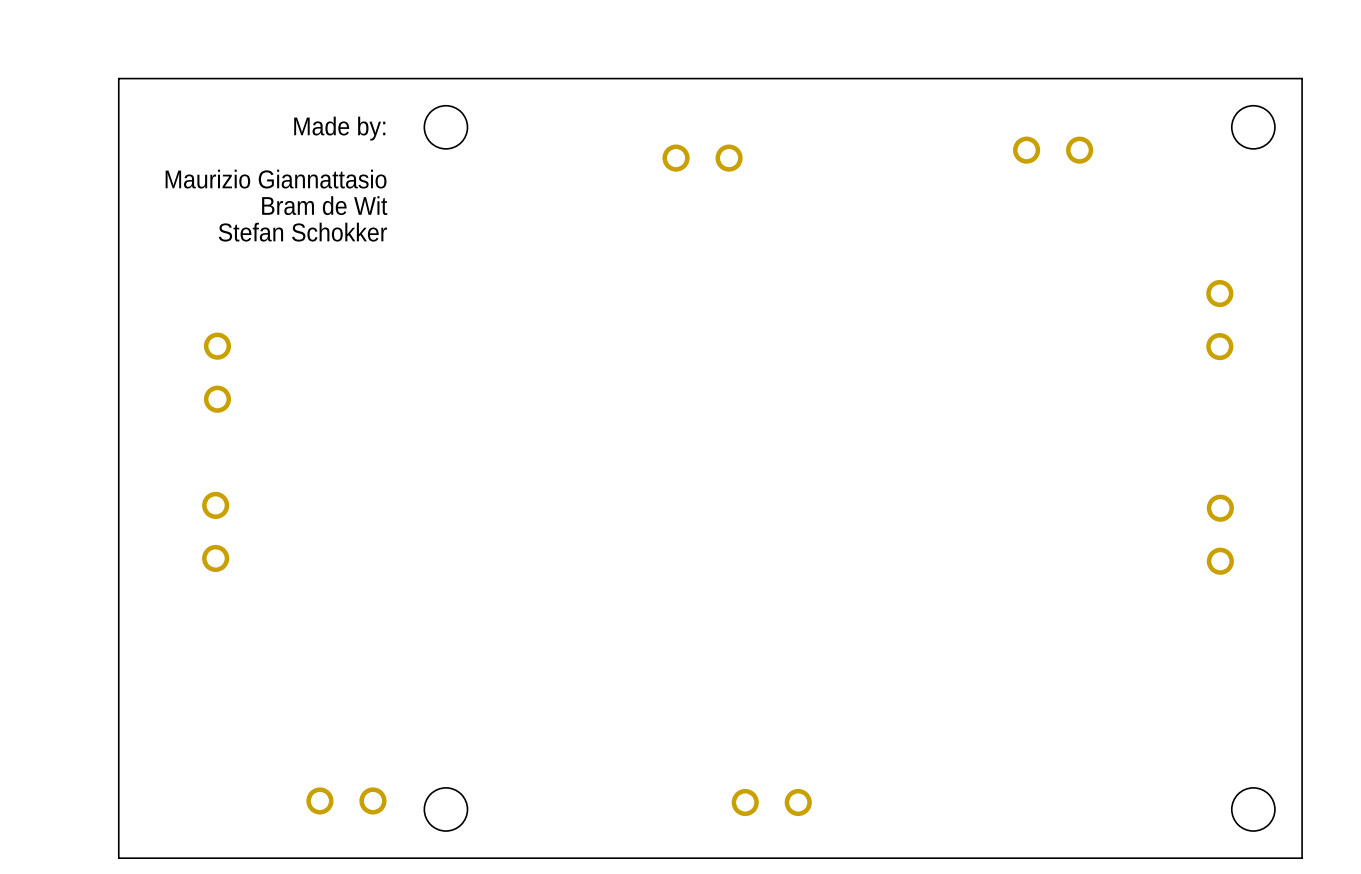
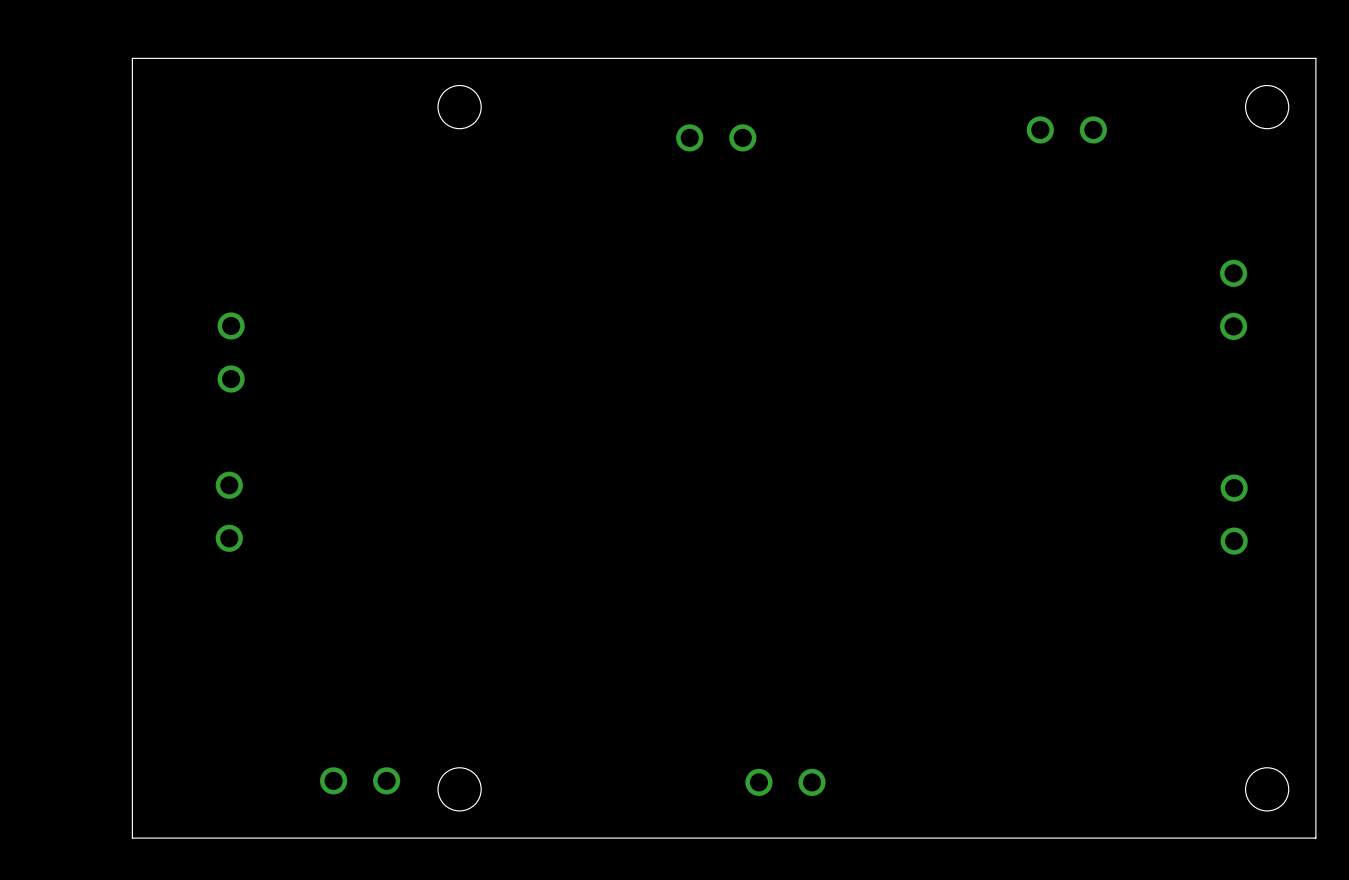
text: Made by: (339, 128) -> none
text: Maurizio Giannattasio (276, 179) -> none
text: Bram de Wit (324, 205) -> none
text: Stefan Schokker (302, 232) -> none

